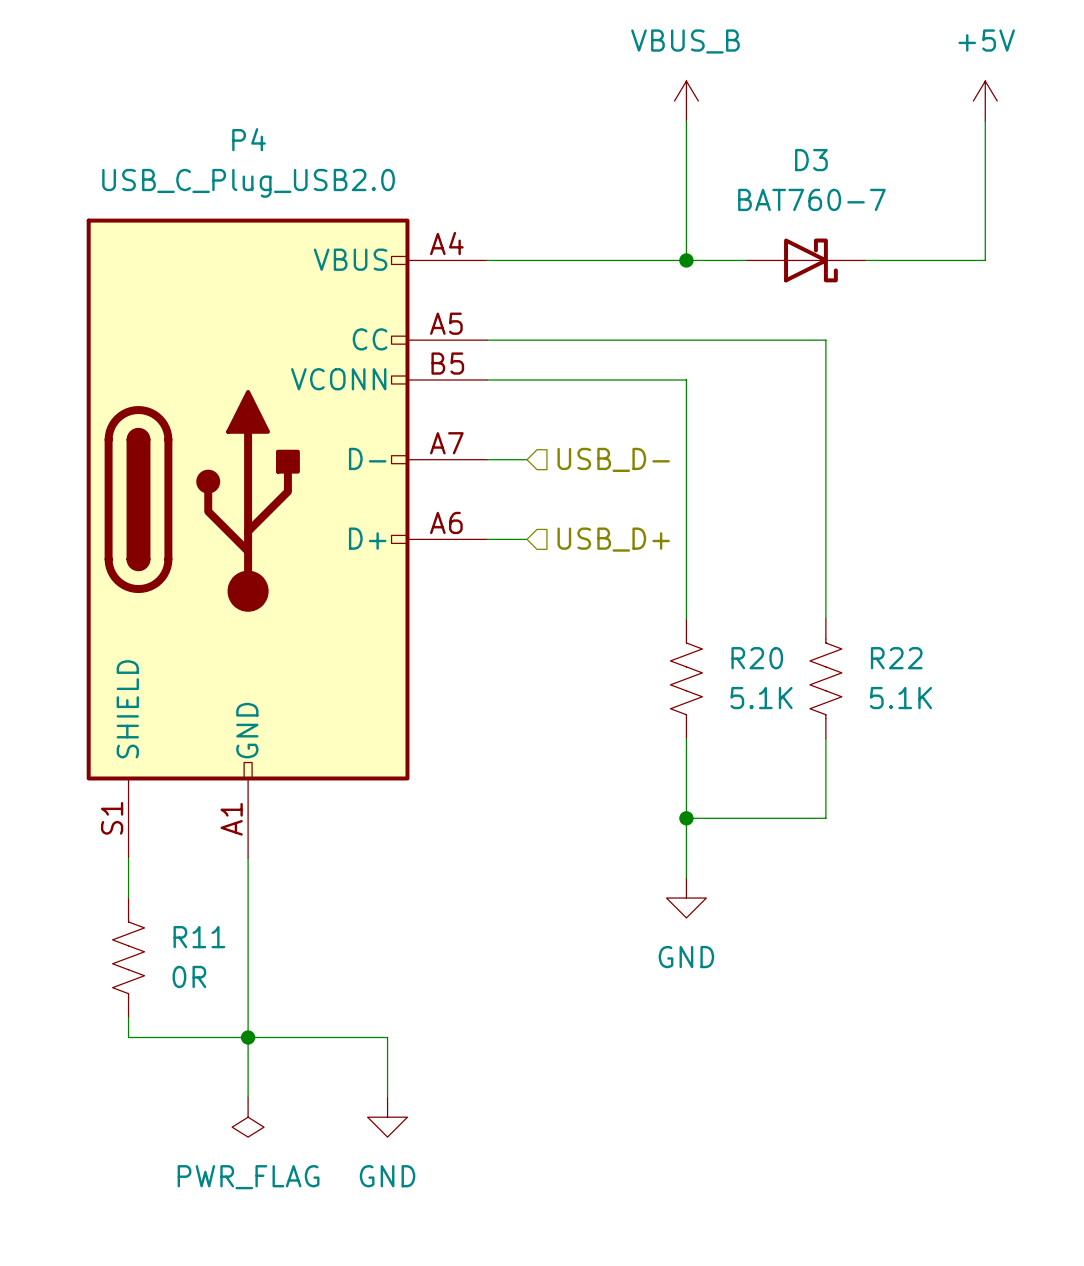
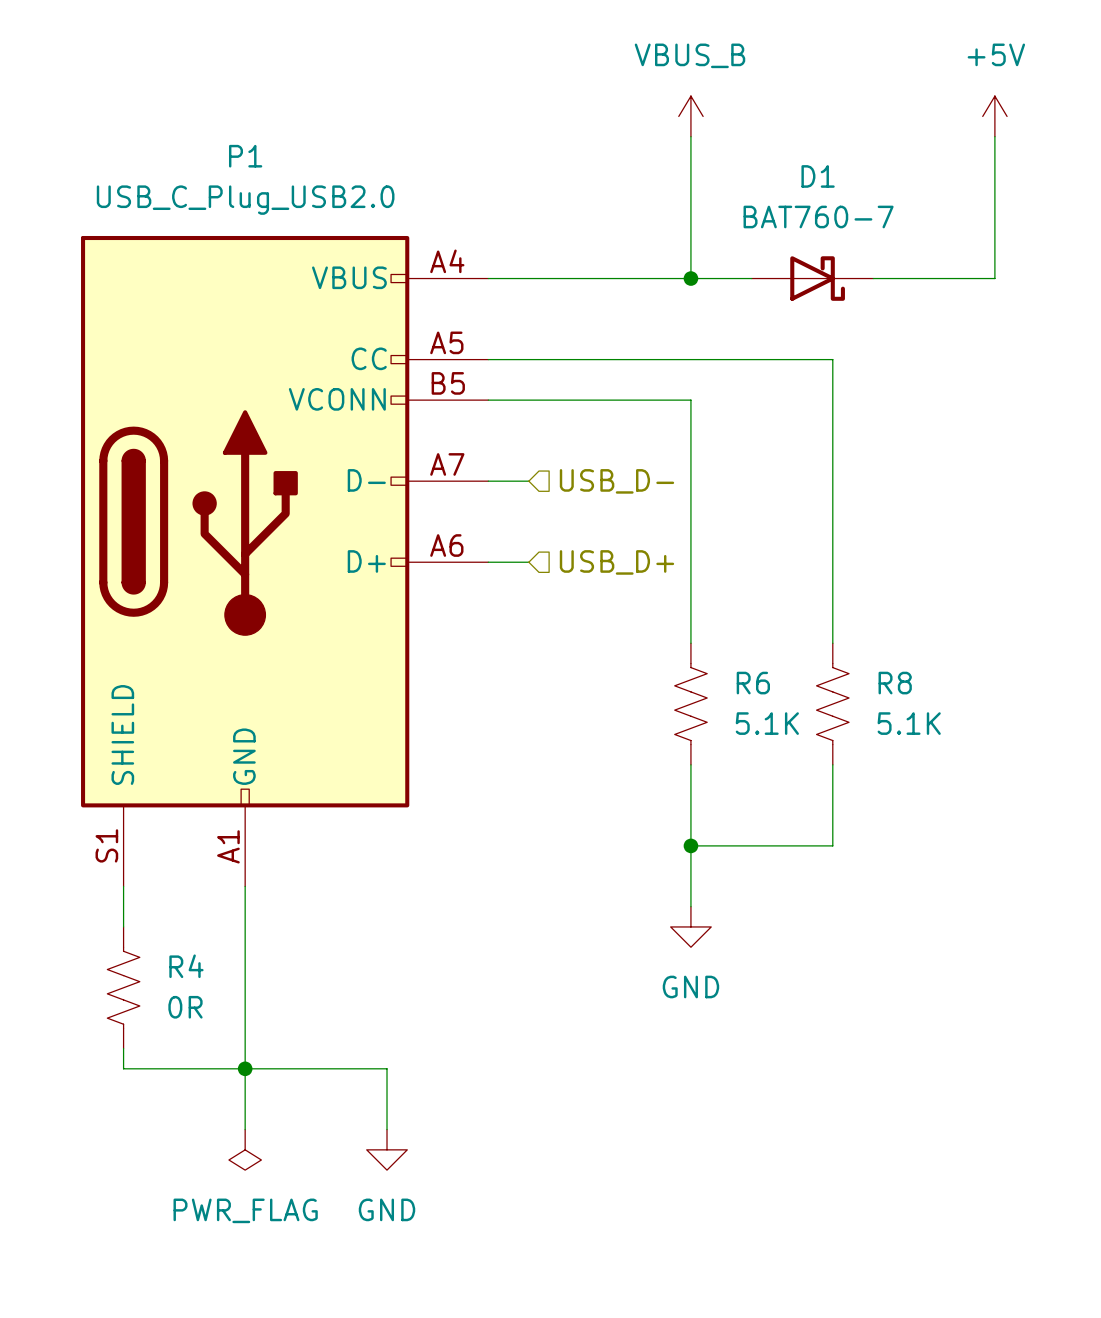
P4 name: P4 (249, 139) -> P1 (245, 156)
D3 name: D3 (811, 160) -> D1 (818, 176)
R20 name: R20 (757, 658) -> R6 (753, 683)
R22 name: R22 (896, 658) -> R8 (895, 683)
R11 name: R11 (199, 937) -> R4 (186, 966)

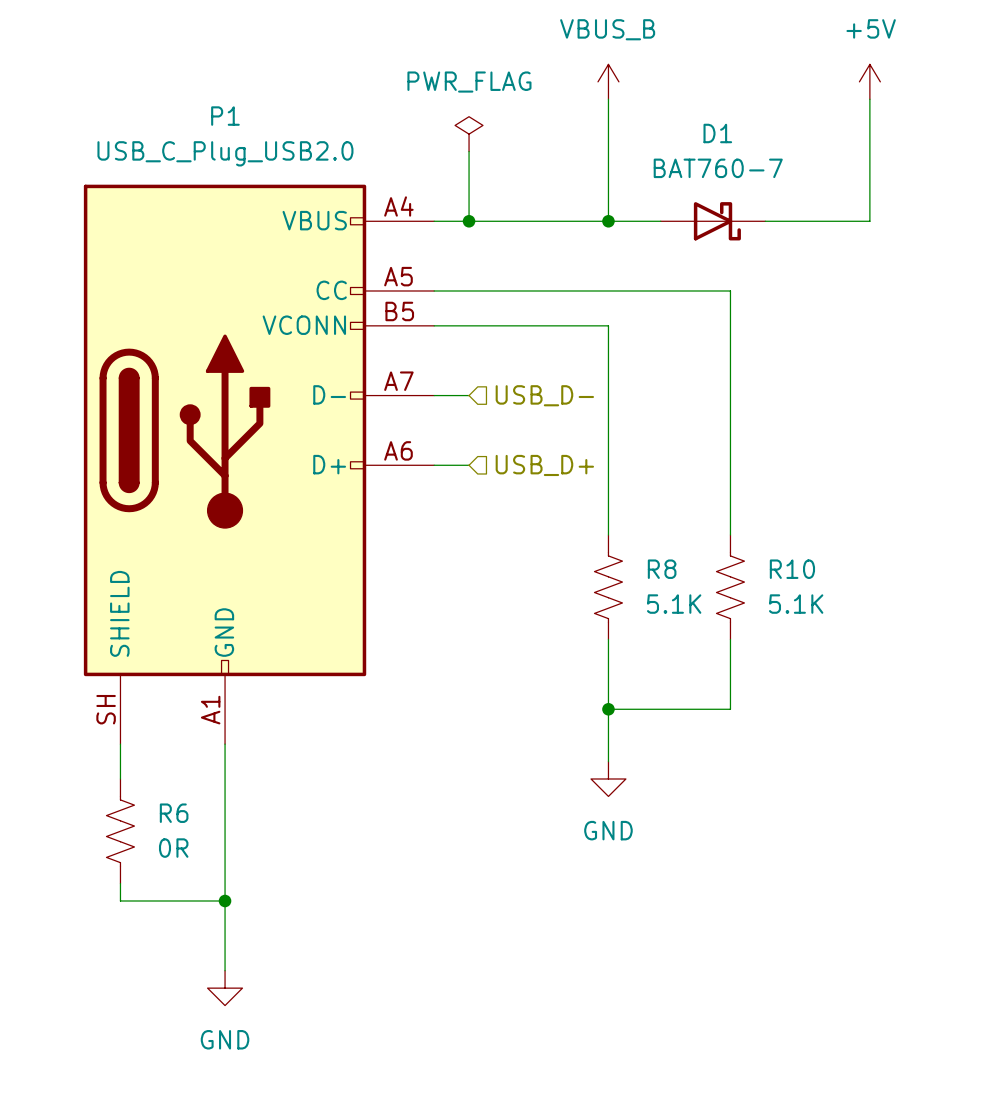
power symbol: none -> PWR_FLAG (469, 134)
wire: none -> (469, 151) (469, 221)
junction: none -> (469, 221)
R6 name: R6 (753, 683) -> R8 (662, 569)
R8 name: R8 (895, 683) -> R10 (792, 569)
P1 pin number: S1 (106, 845) -> SH (106, 709)
R4 name: R4 (186, 966) -> R6 (174, 813)
wire: (245, 1068) (387, 1068) (387, 1129) -> none
power symbol: PWR_FLAG (245, 1149) -> none
power symbol position: GND (387, 1149) -> GND (225, 988)

